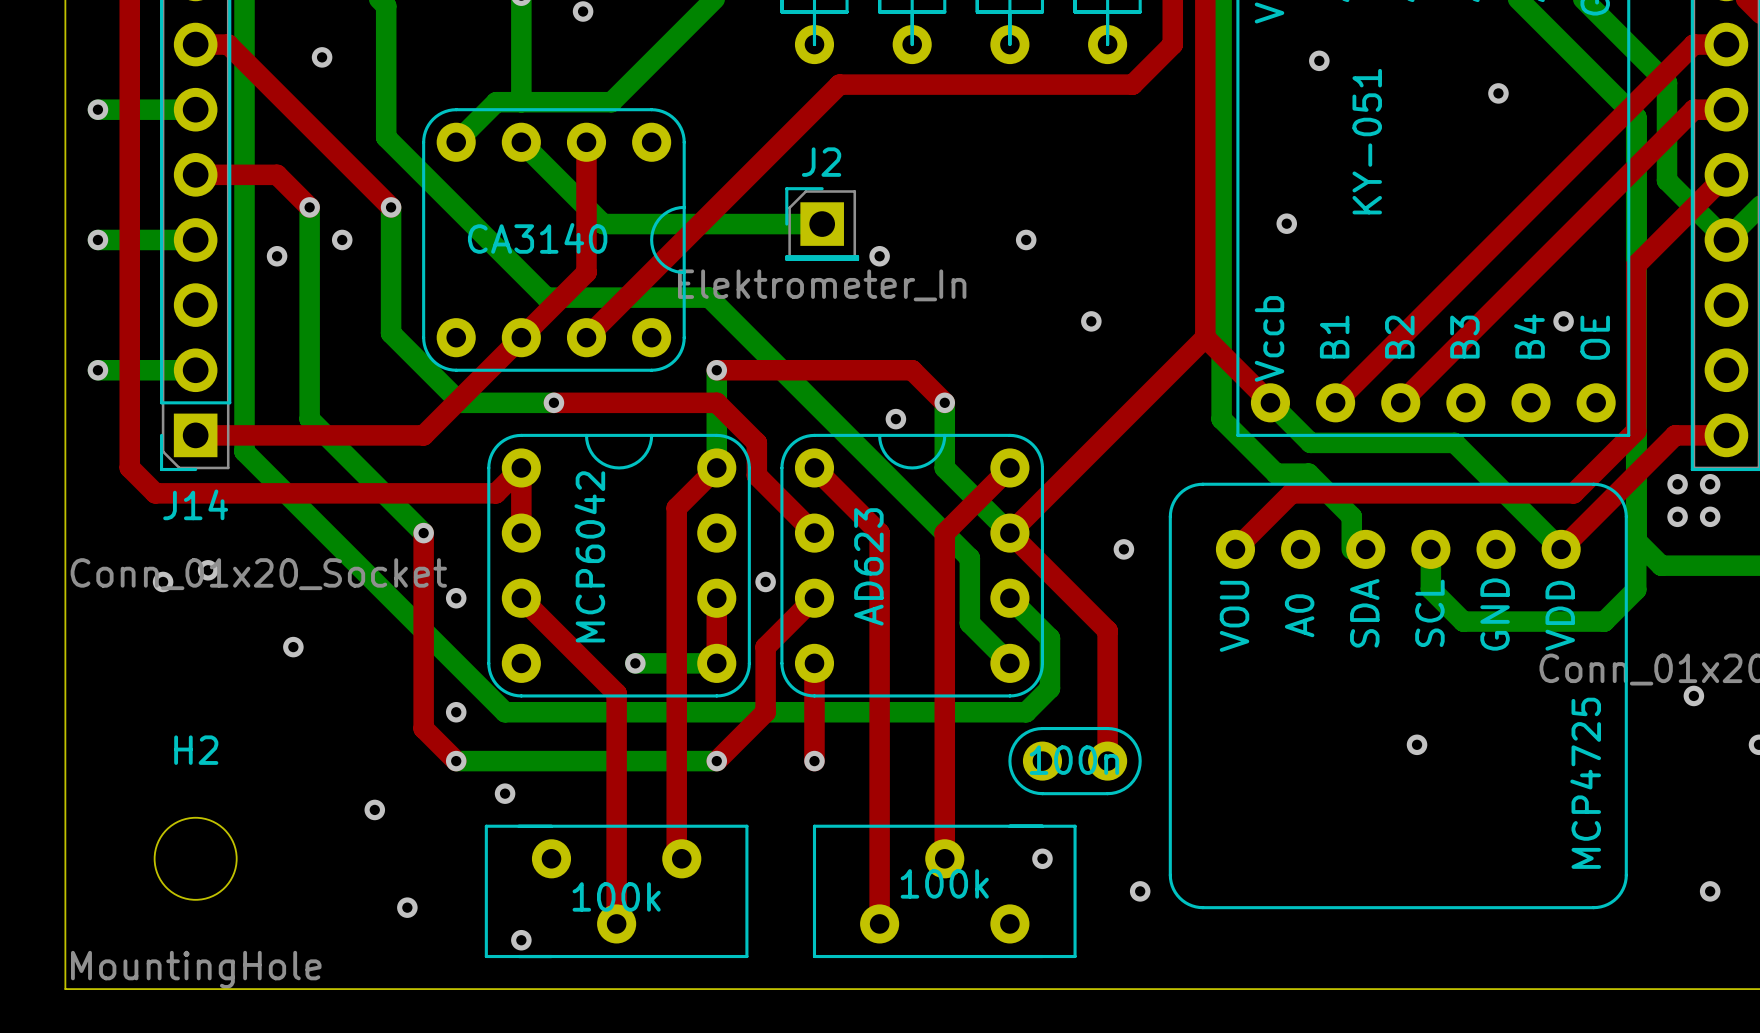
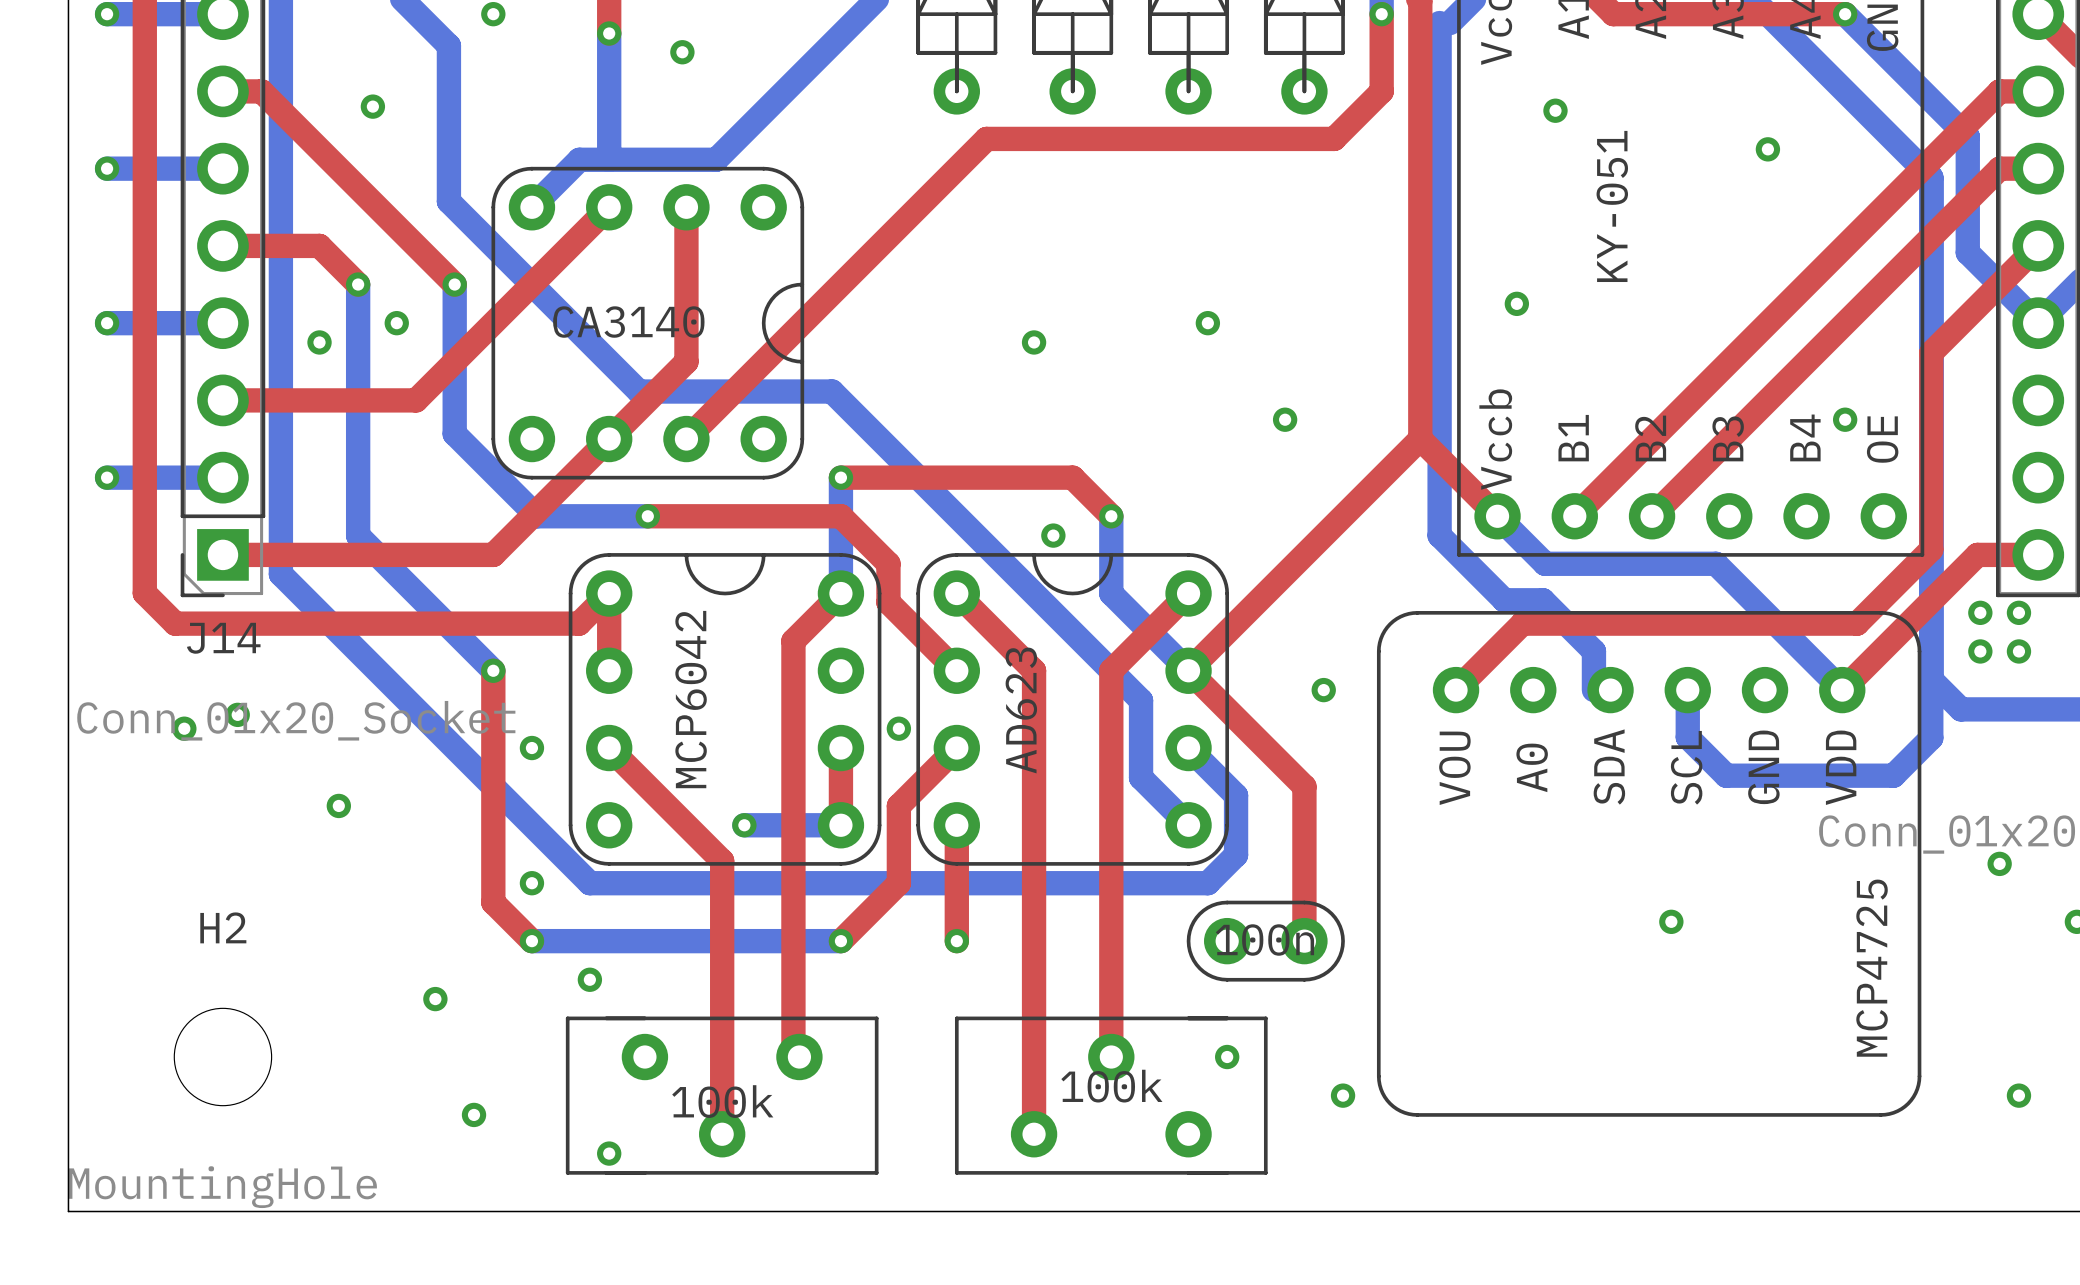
top track: none -> (609, 207) (416, 400) (222, 400)
bottom track: (521, 142) (603, 224) (822, 224) -> none
J2: Elektrometer_In (822, 224) -> none

